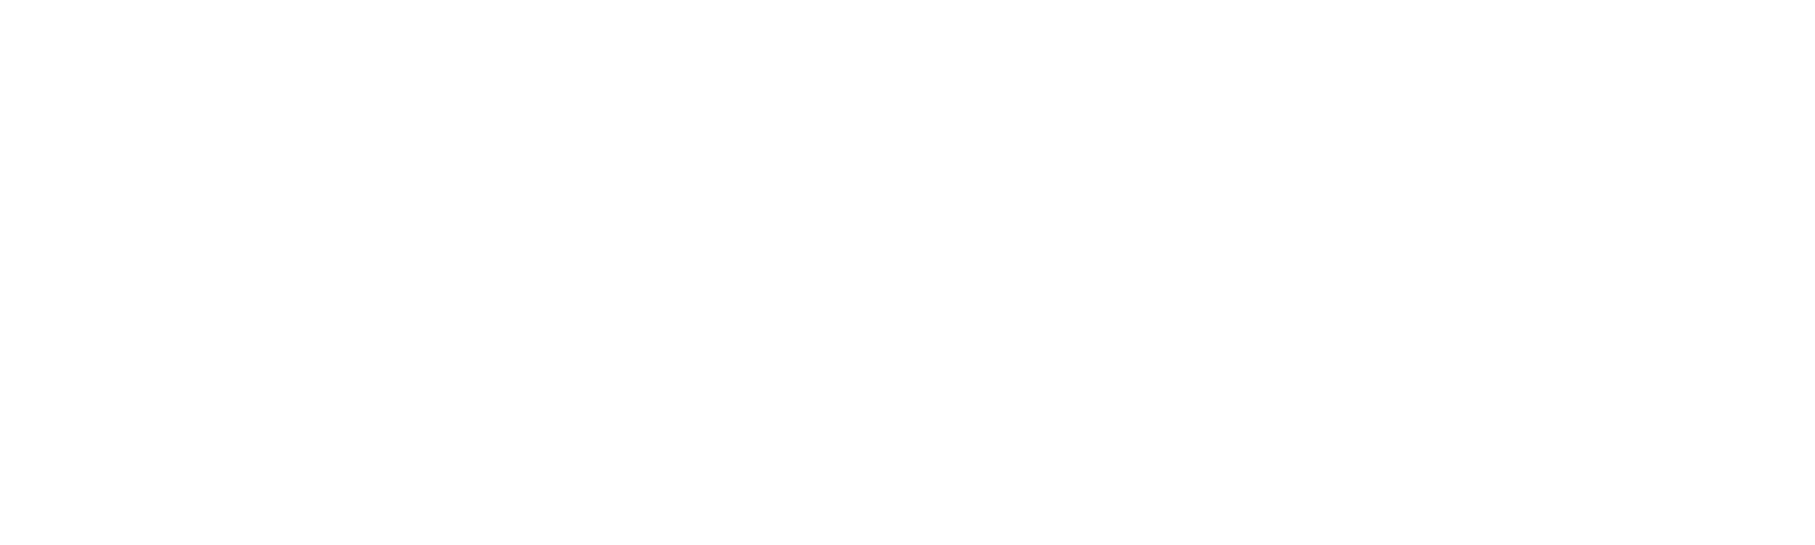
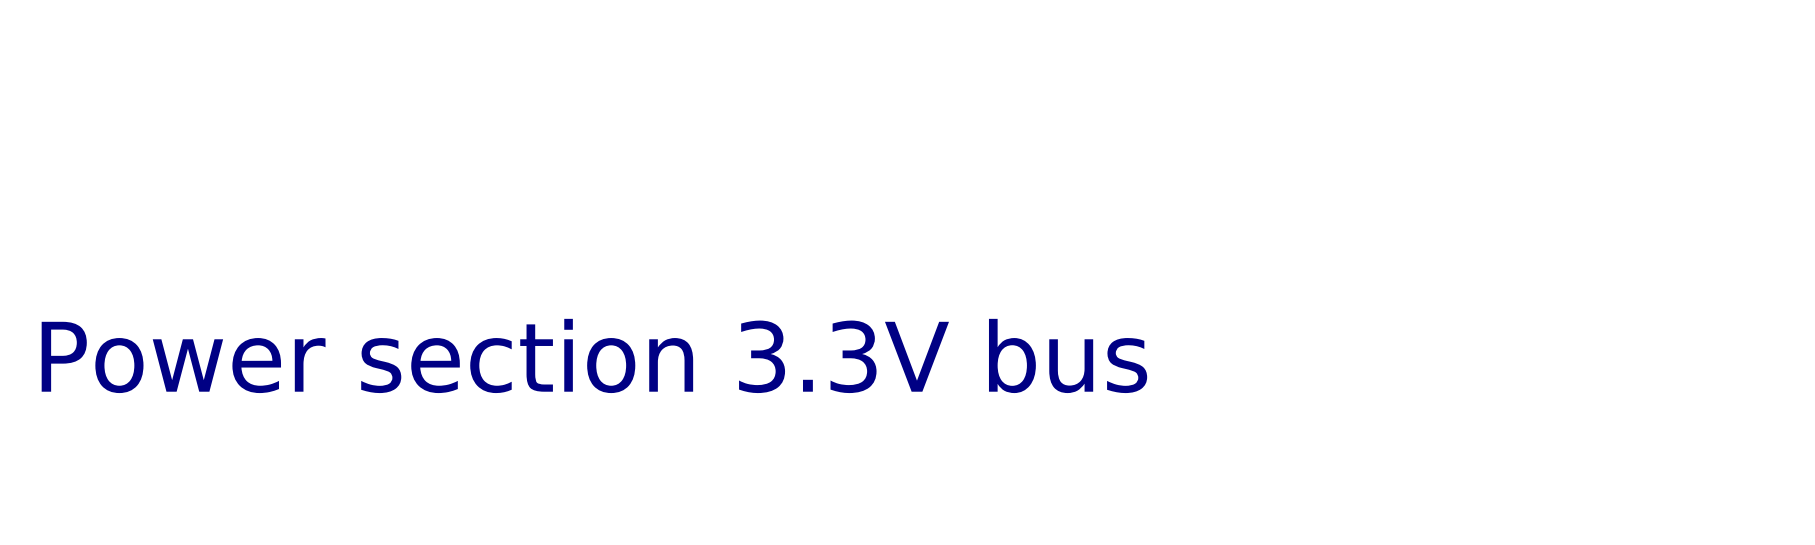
text: none -> Power section 3.3V bus (594, 355)

